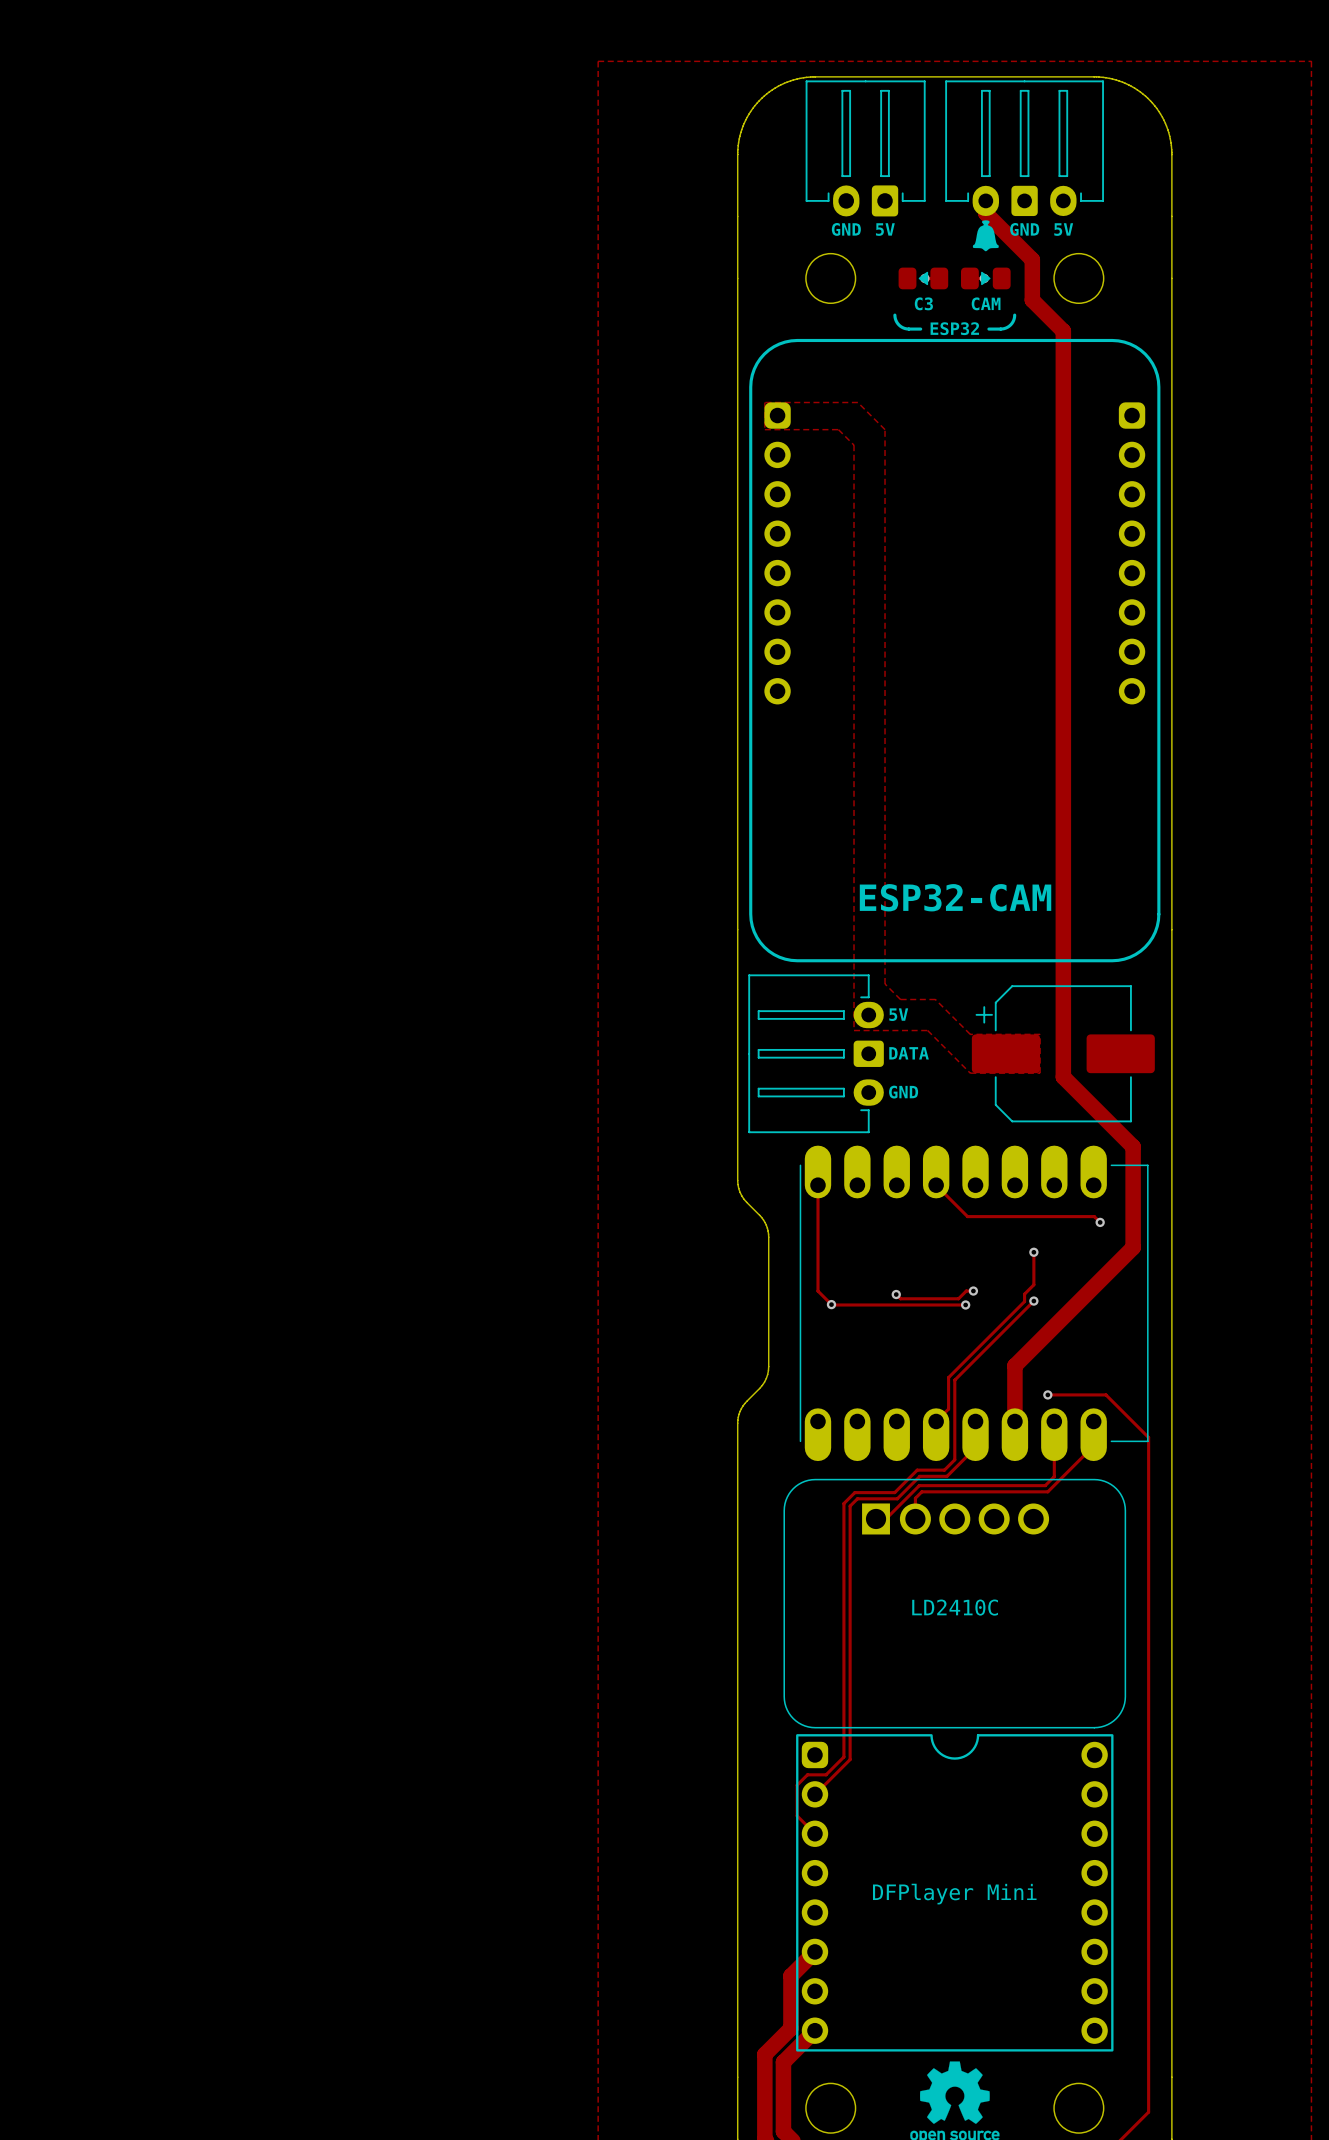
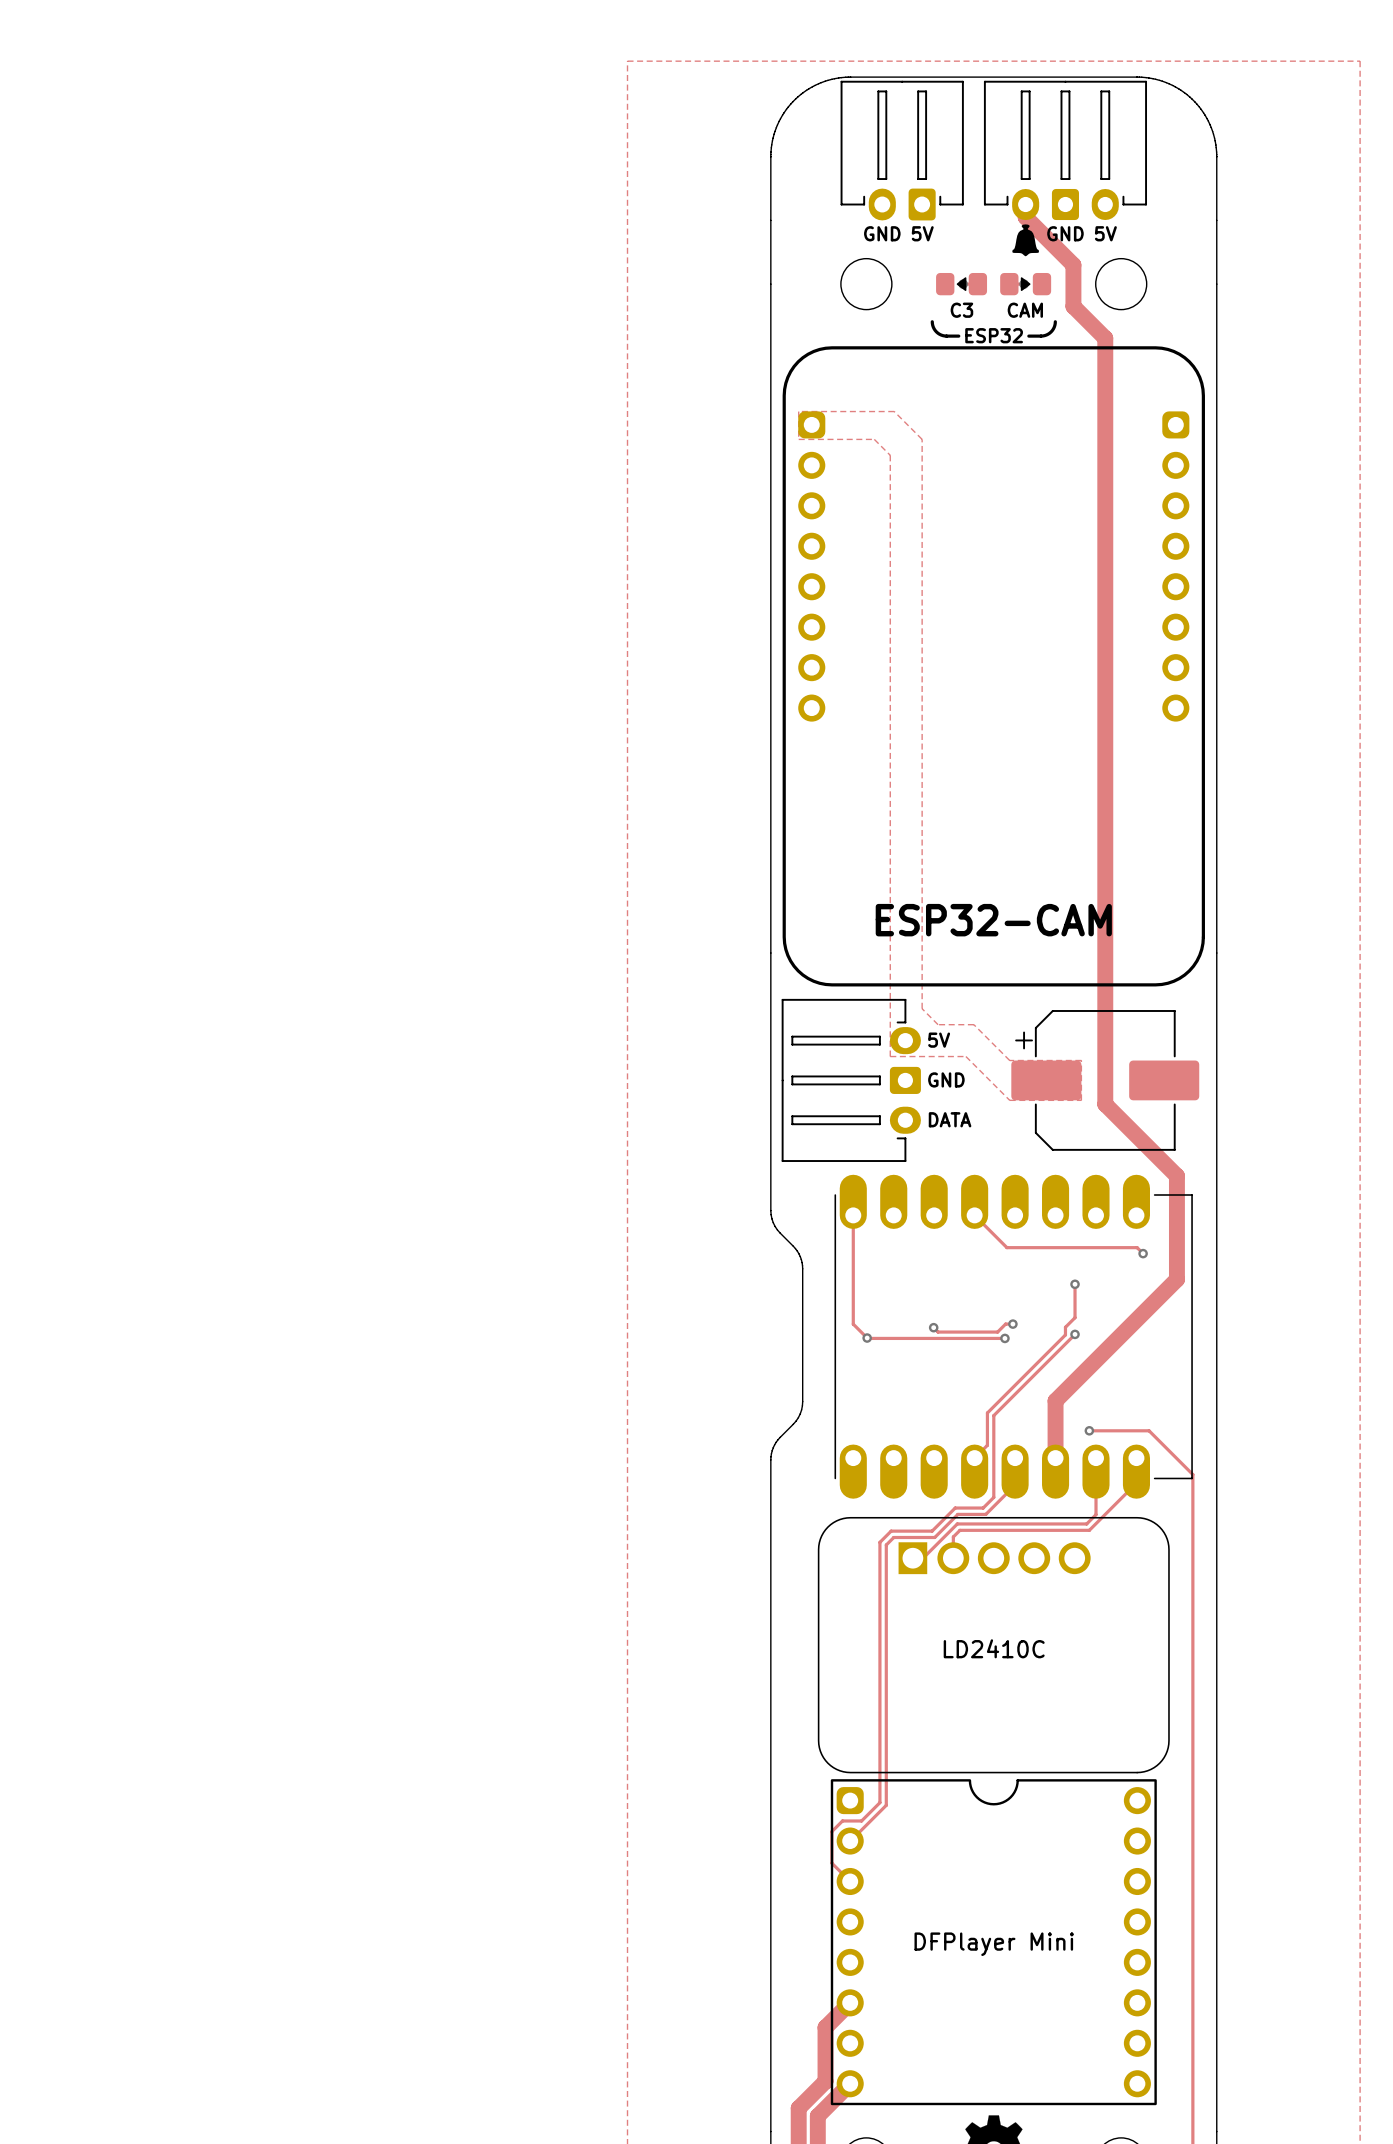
text: DATA (909, 1053) -> GND (946, 1079)
text: GND (903, 1092) -> DATA (950, 1119)

